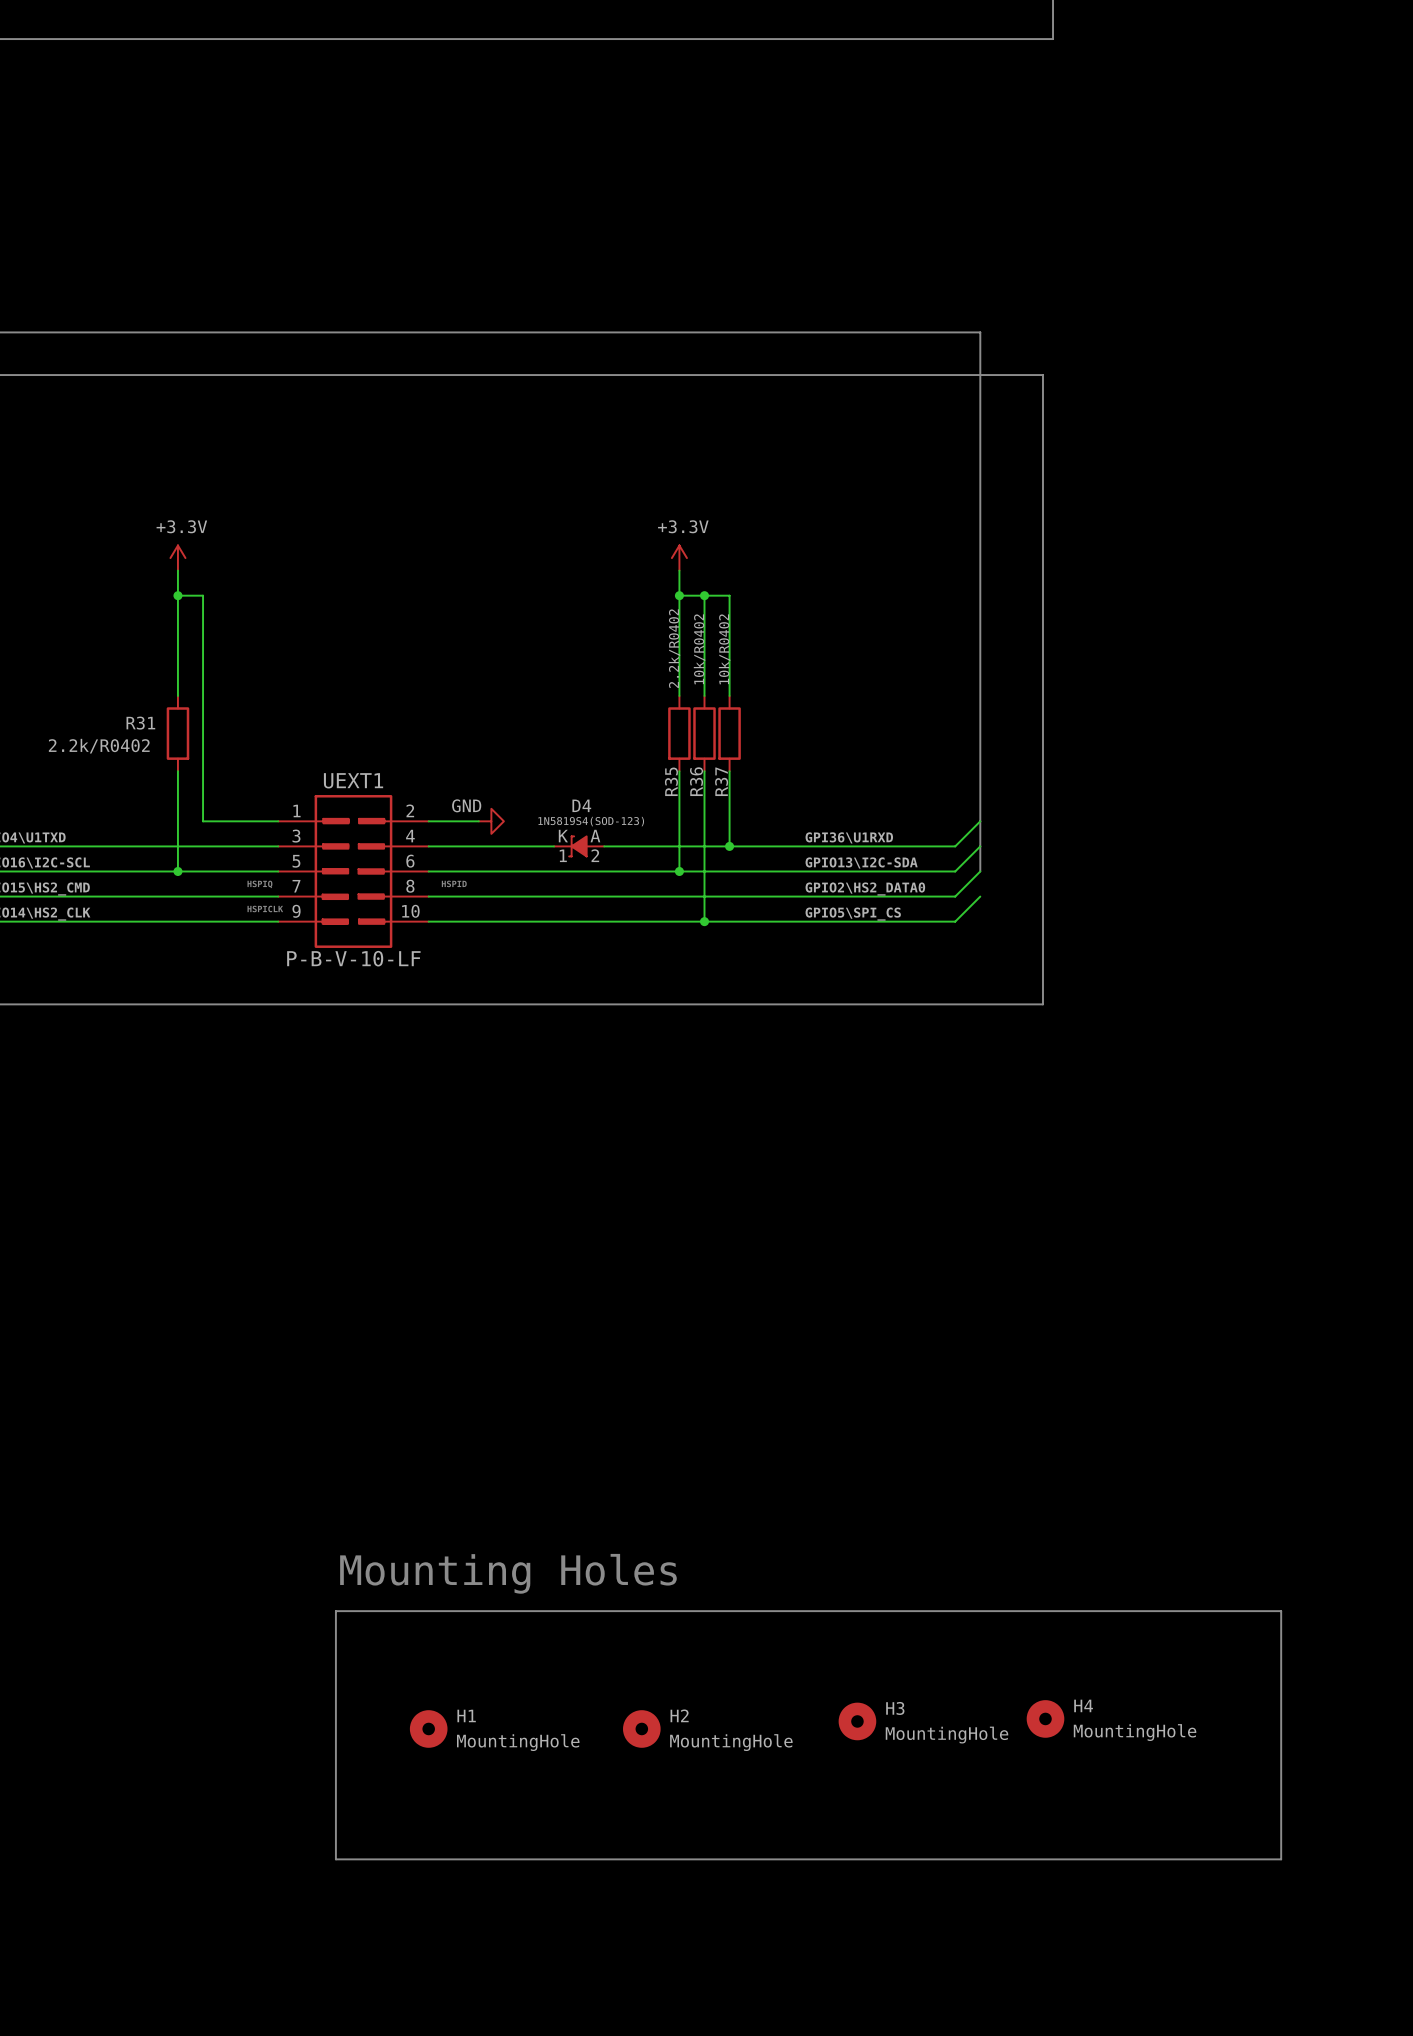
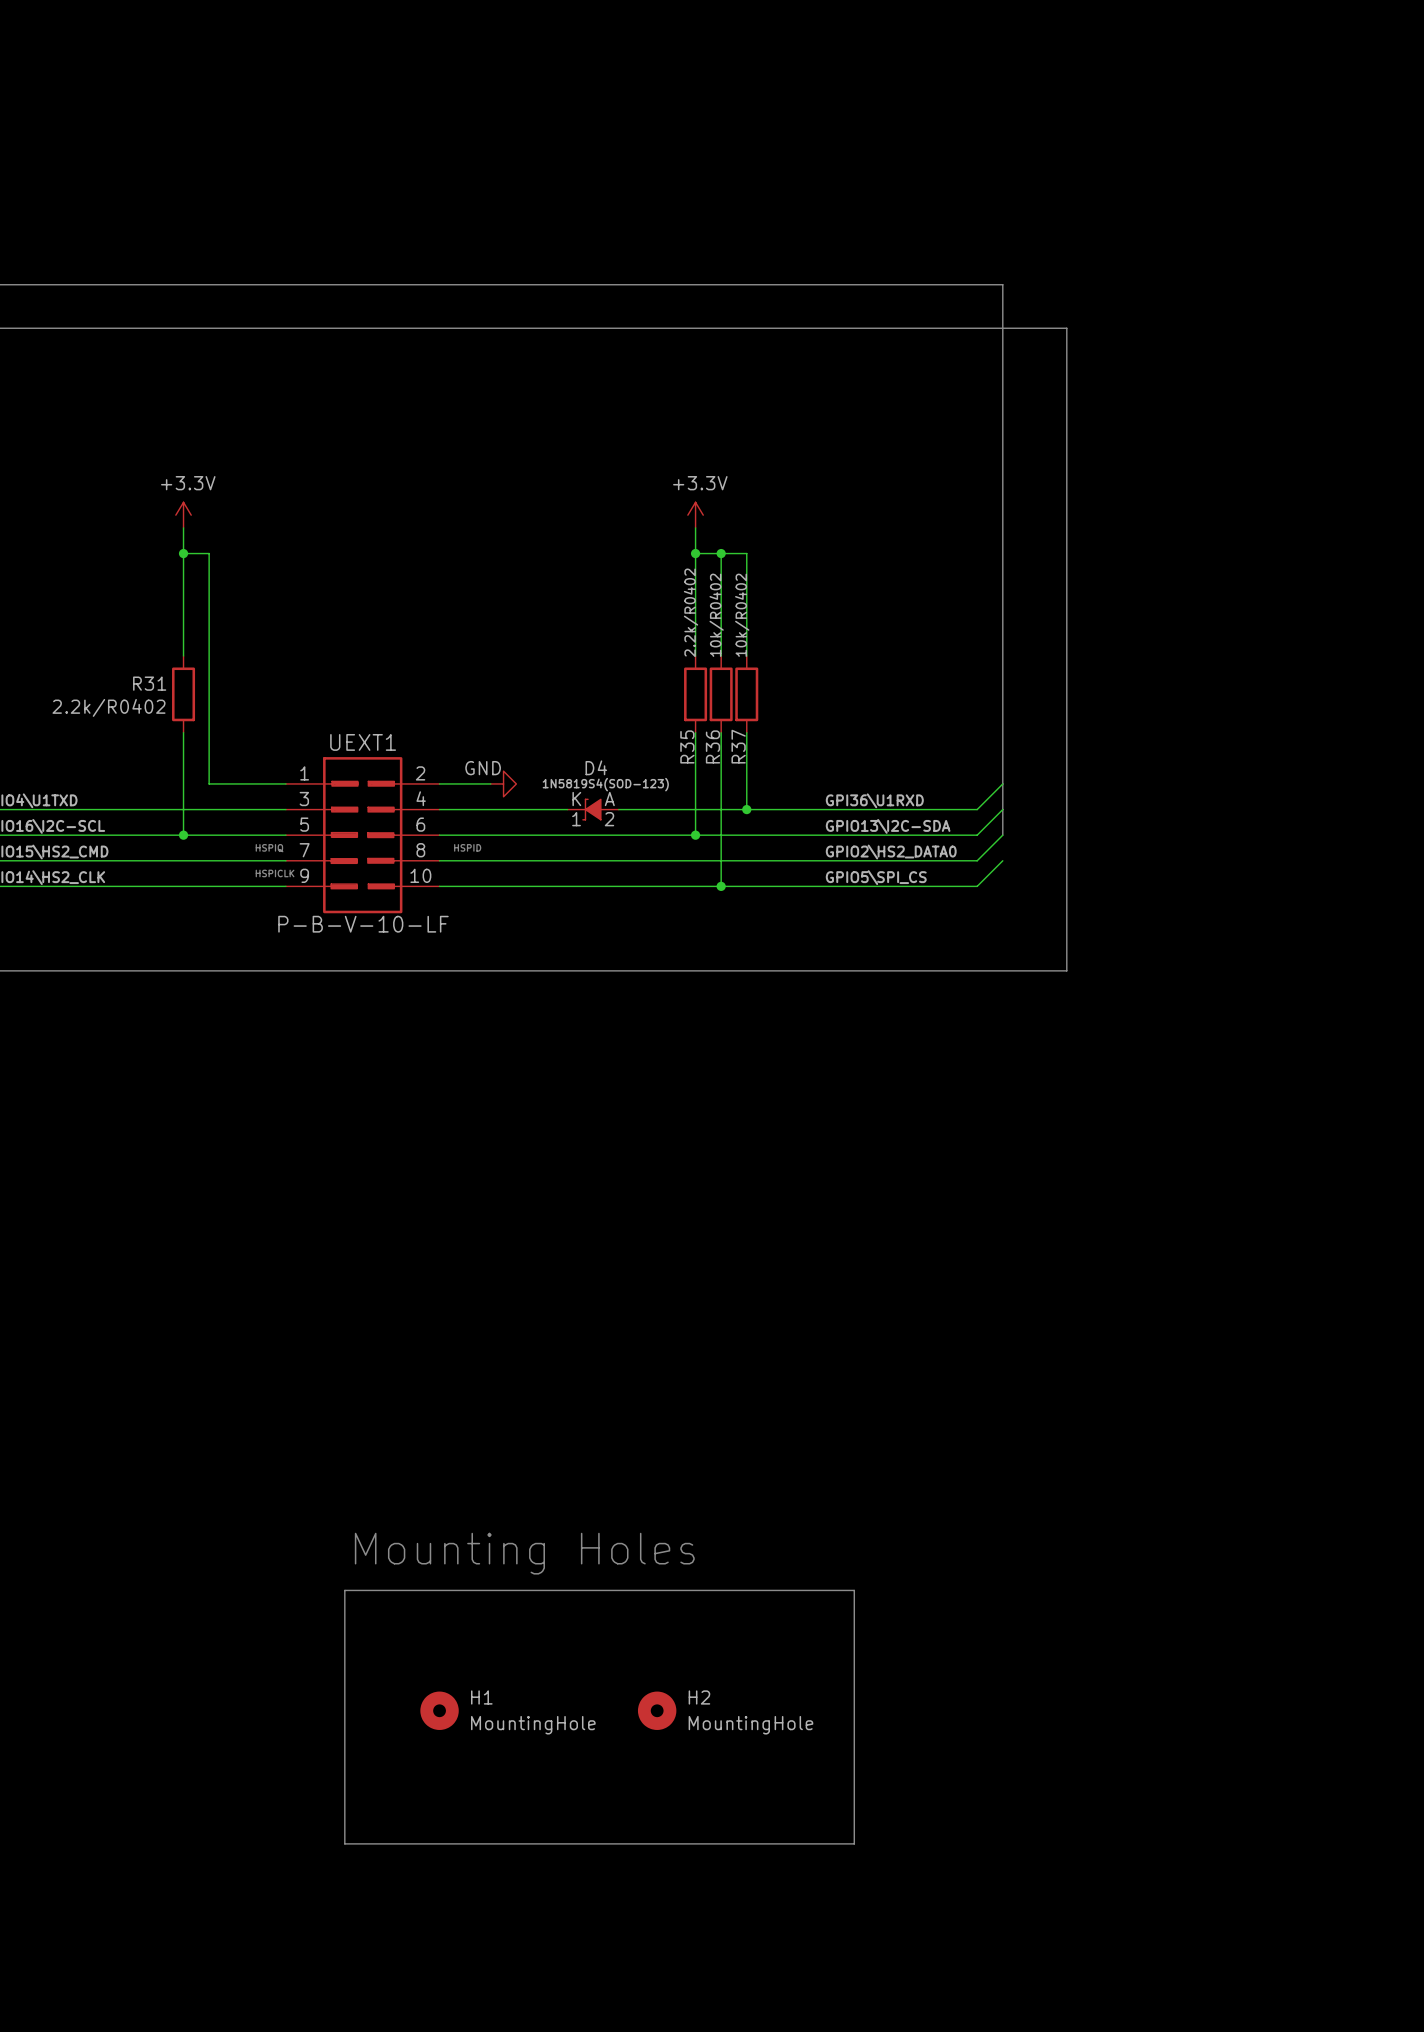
line: (834, 1611) (1281, 1611) (1281, 1859) (834, 1859) -> (854, 1590) (854, 1843)
H4: MountingHole (1045, 1718) -> none
H3: MountingHole (857, 1721) -> none

